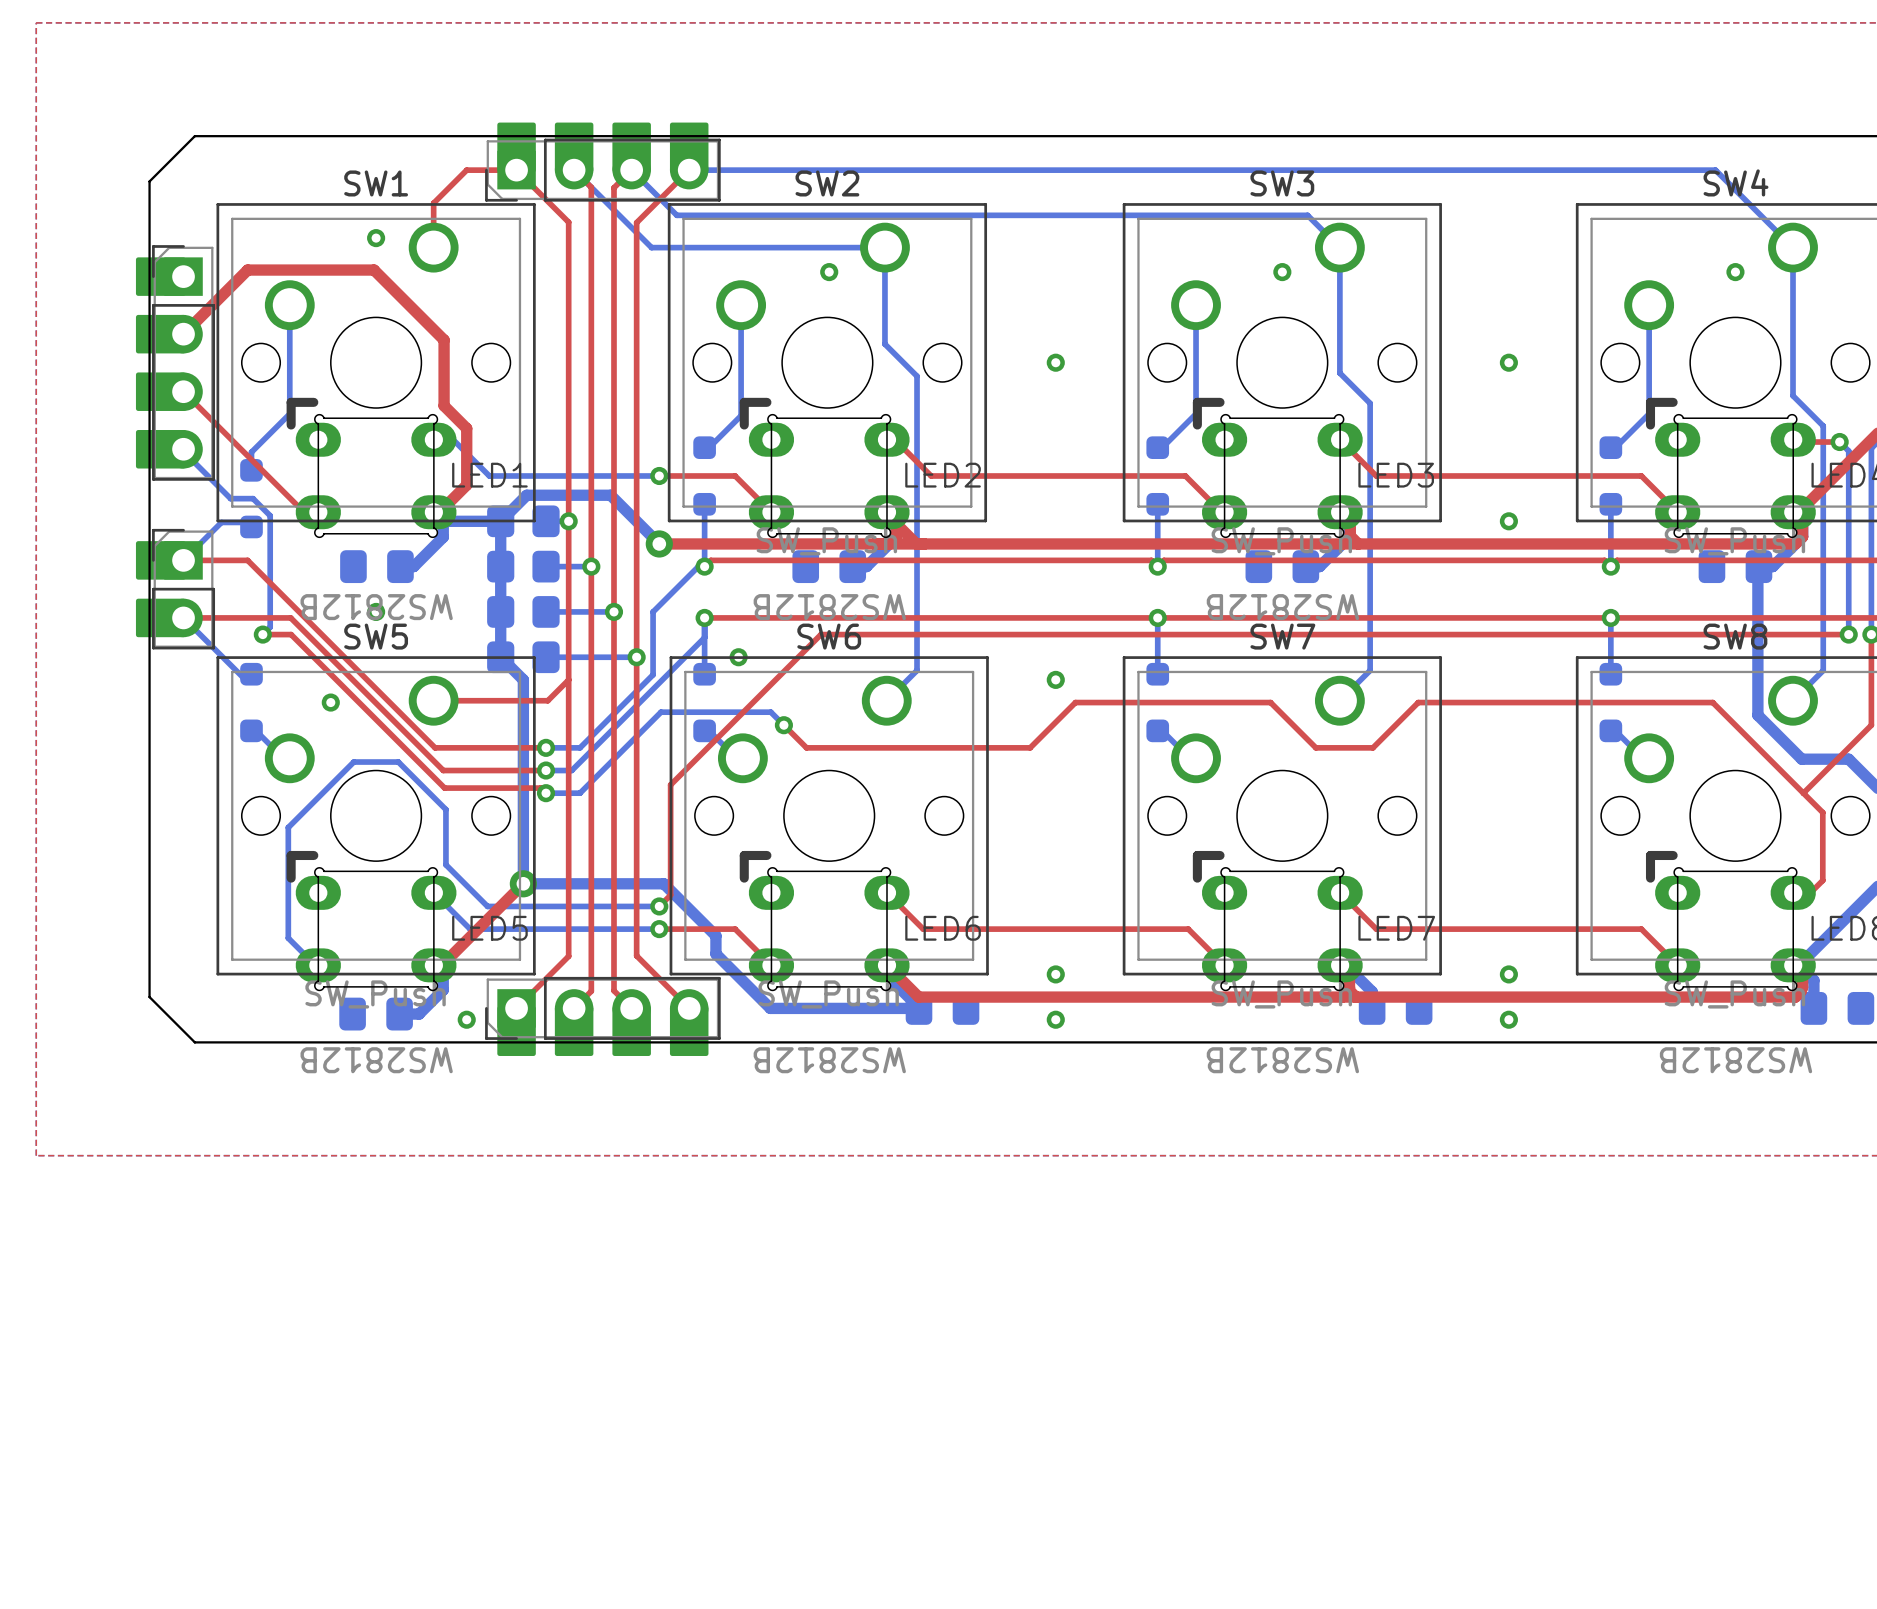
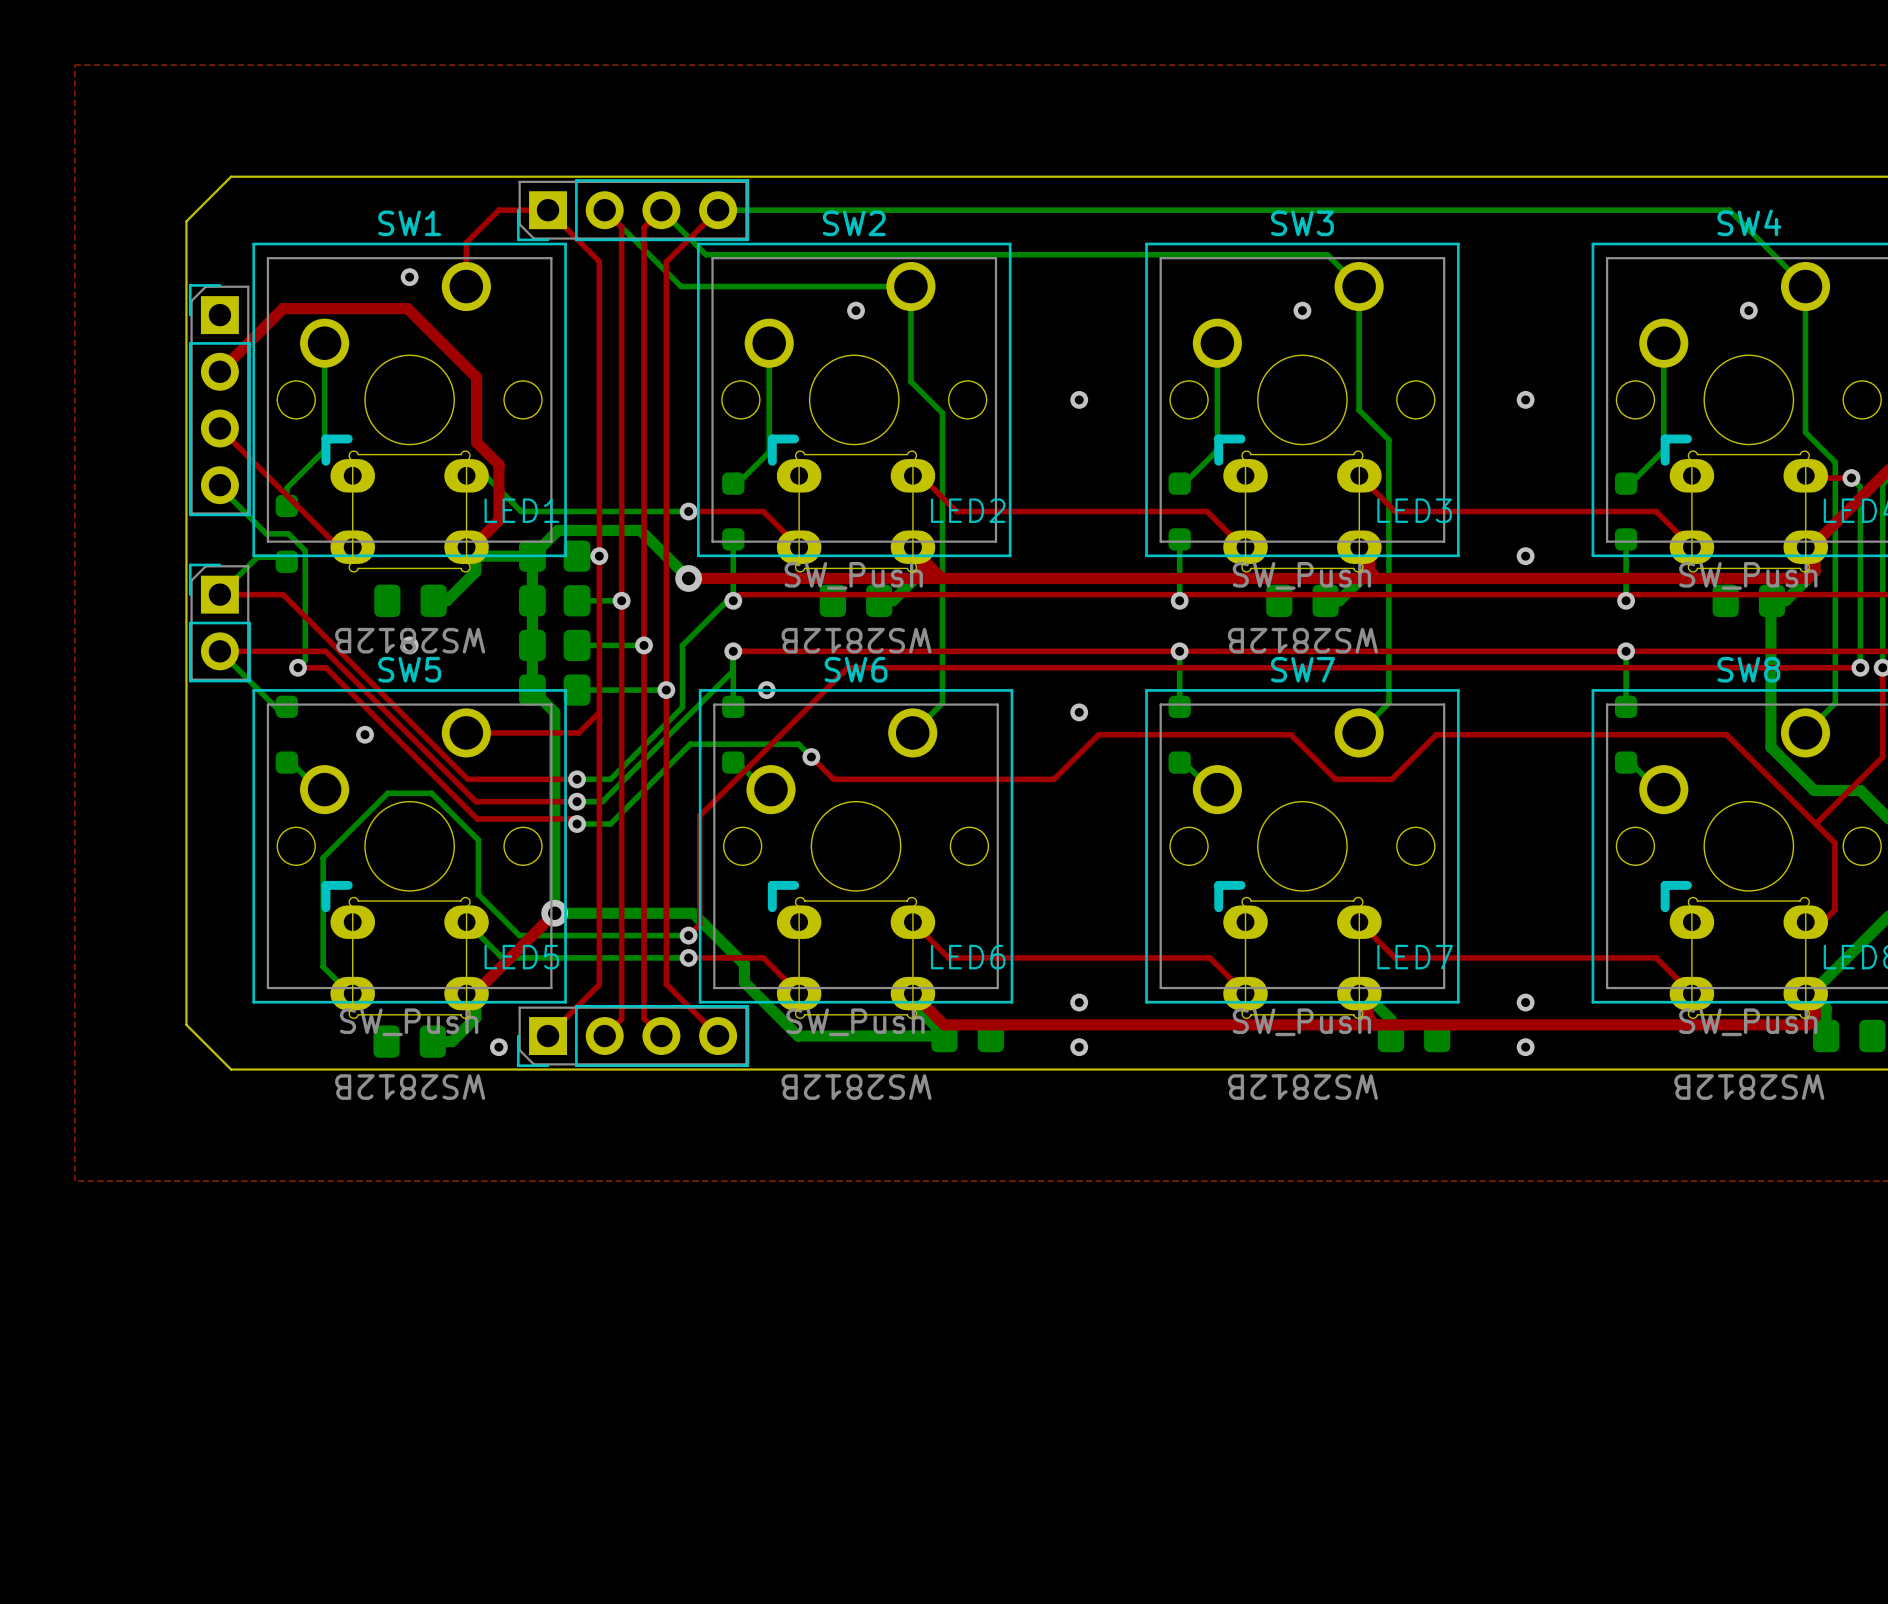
part footprint: [485, 122, 721, 202] -> [517, 179, 750, 242]
part footprint: [135, 245, 216, 481] -> [188, 284, 251, 517]
part footprint: [135, 528, 216, 650] -> [188, 563, 251, 683]
part footprint: [485, 976, 721, 1056] -> [517, 1005, 750, 1068]

